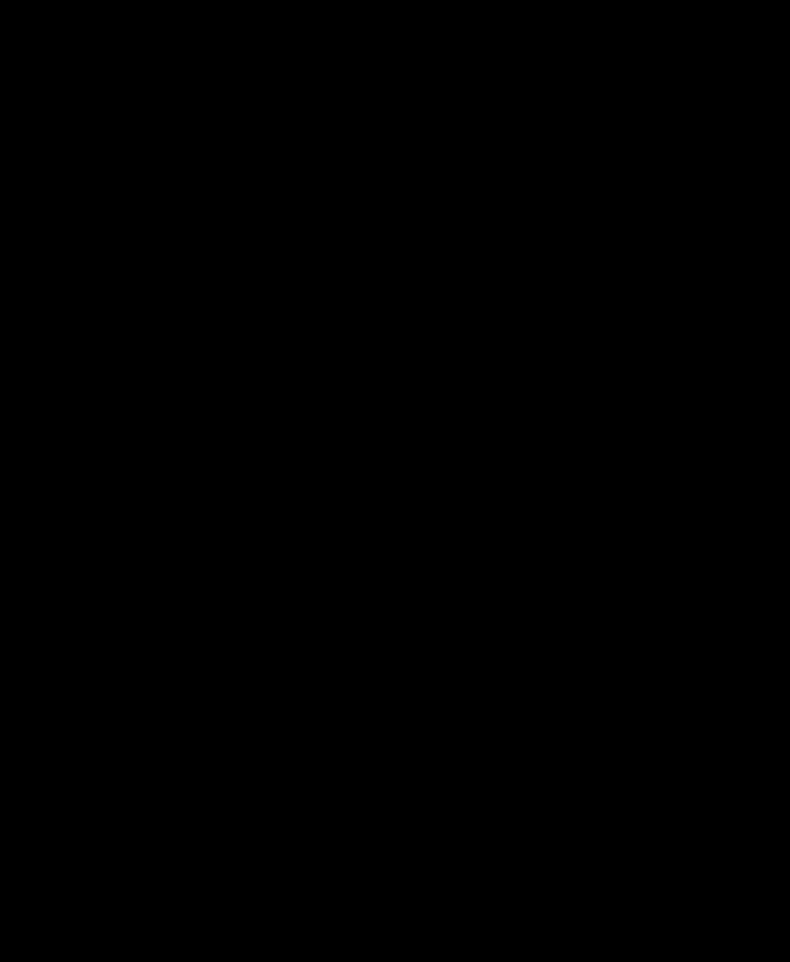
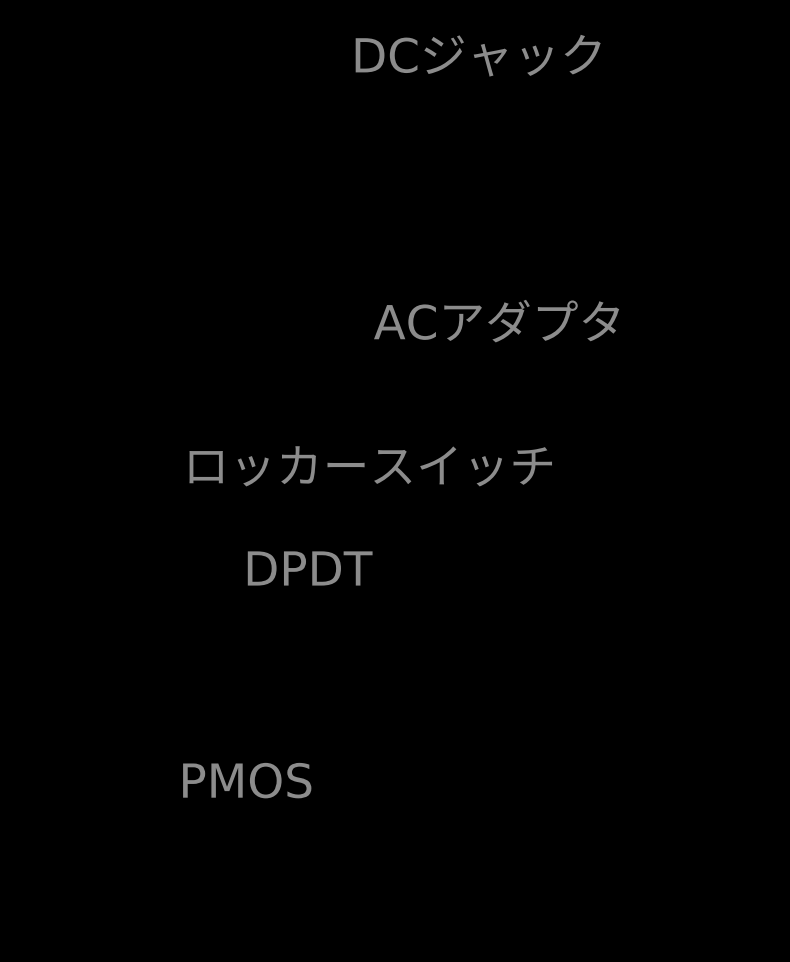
text: none -> DCジャック (478, 55)
text: none -> ACアダプタ (496, 321)
text: none -> ロッカースイッチ (370, 466)
text: none -> DPDT (310, 568)
text: none -> PMOS (247, 780)

